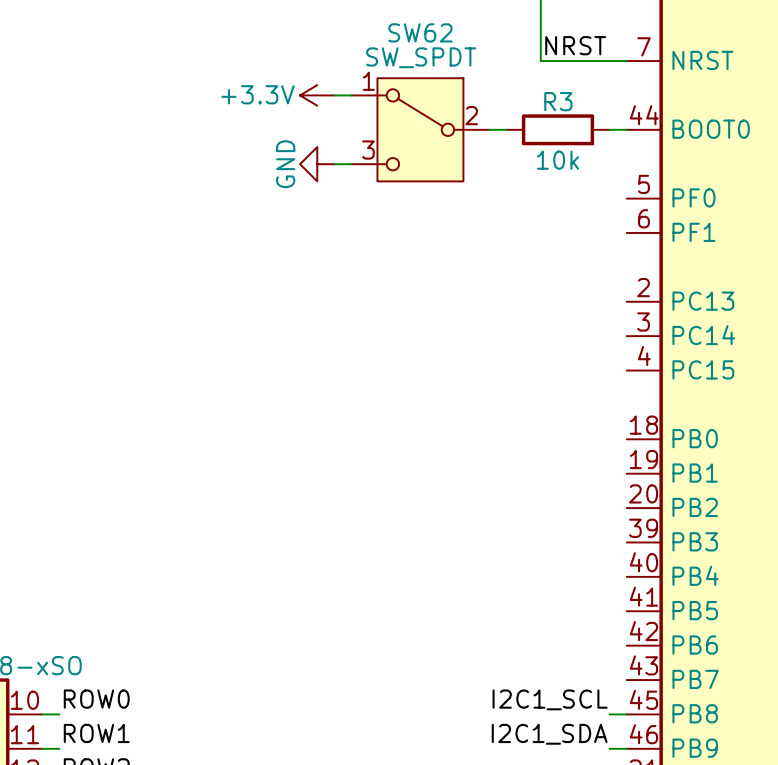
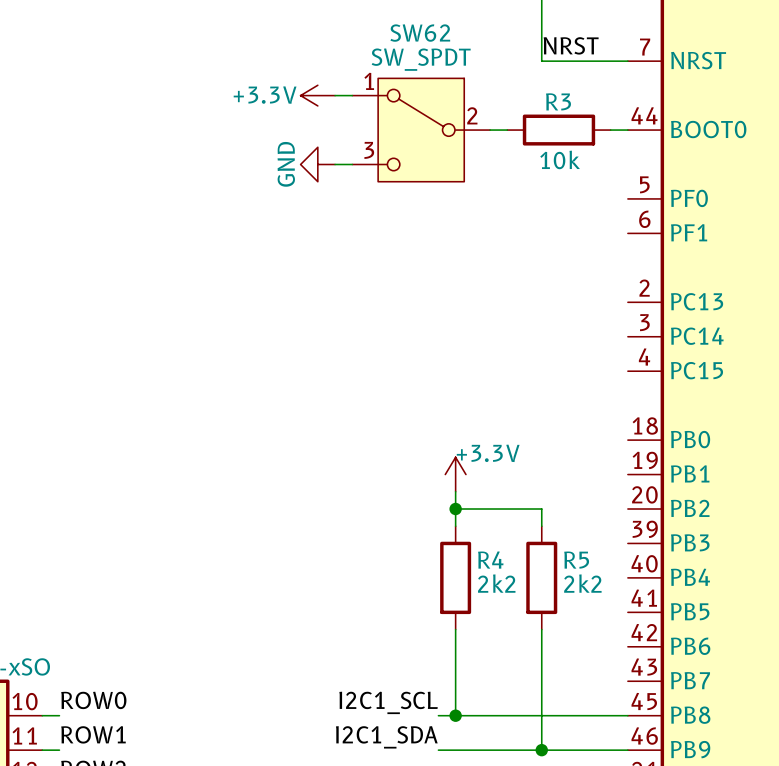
power symbol: none -> +3.3V (455, 474)
wire: none -> (455, 491) (455, 526)
wire: none -> (455, 509) (541, 509) (541, 526)
junction: none -> (455, 509)
R4: none -> 2k2 (455, 577)
R5: none -> 2k2 (541, 577)
wire: none -> (455, 629) (455, 715)
wire: none -> (541, 629) (541, 750)
label position: I2C1_SCL (550, 699) -> I2C1_SCL (388, 702)
wire: none -> (438, 715) (610, 715)
junction: none -> (455, 715)
label position: I2C1_SDA (549, 734) -> I2C1_SDA (386, 737)
wire: none -> (438, 750) (610, 750)
junction: none -> (541, 750)

